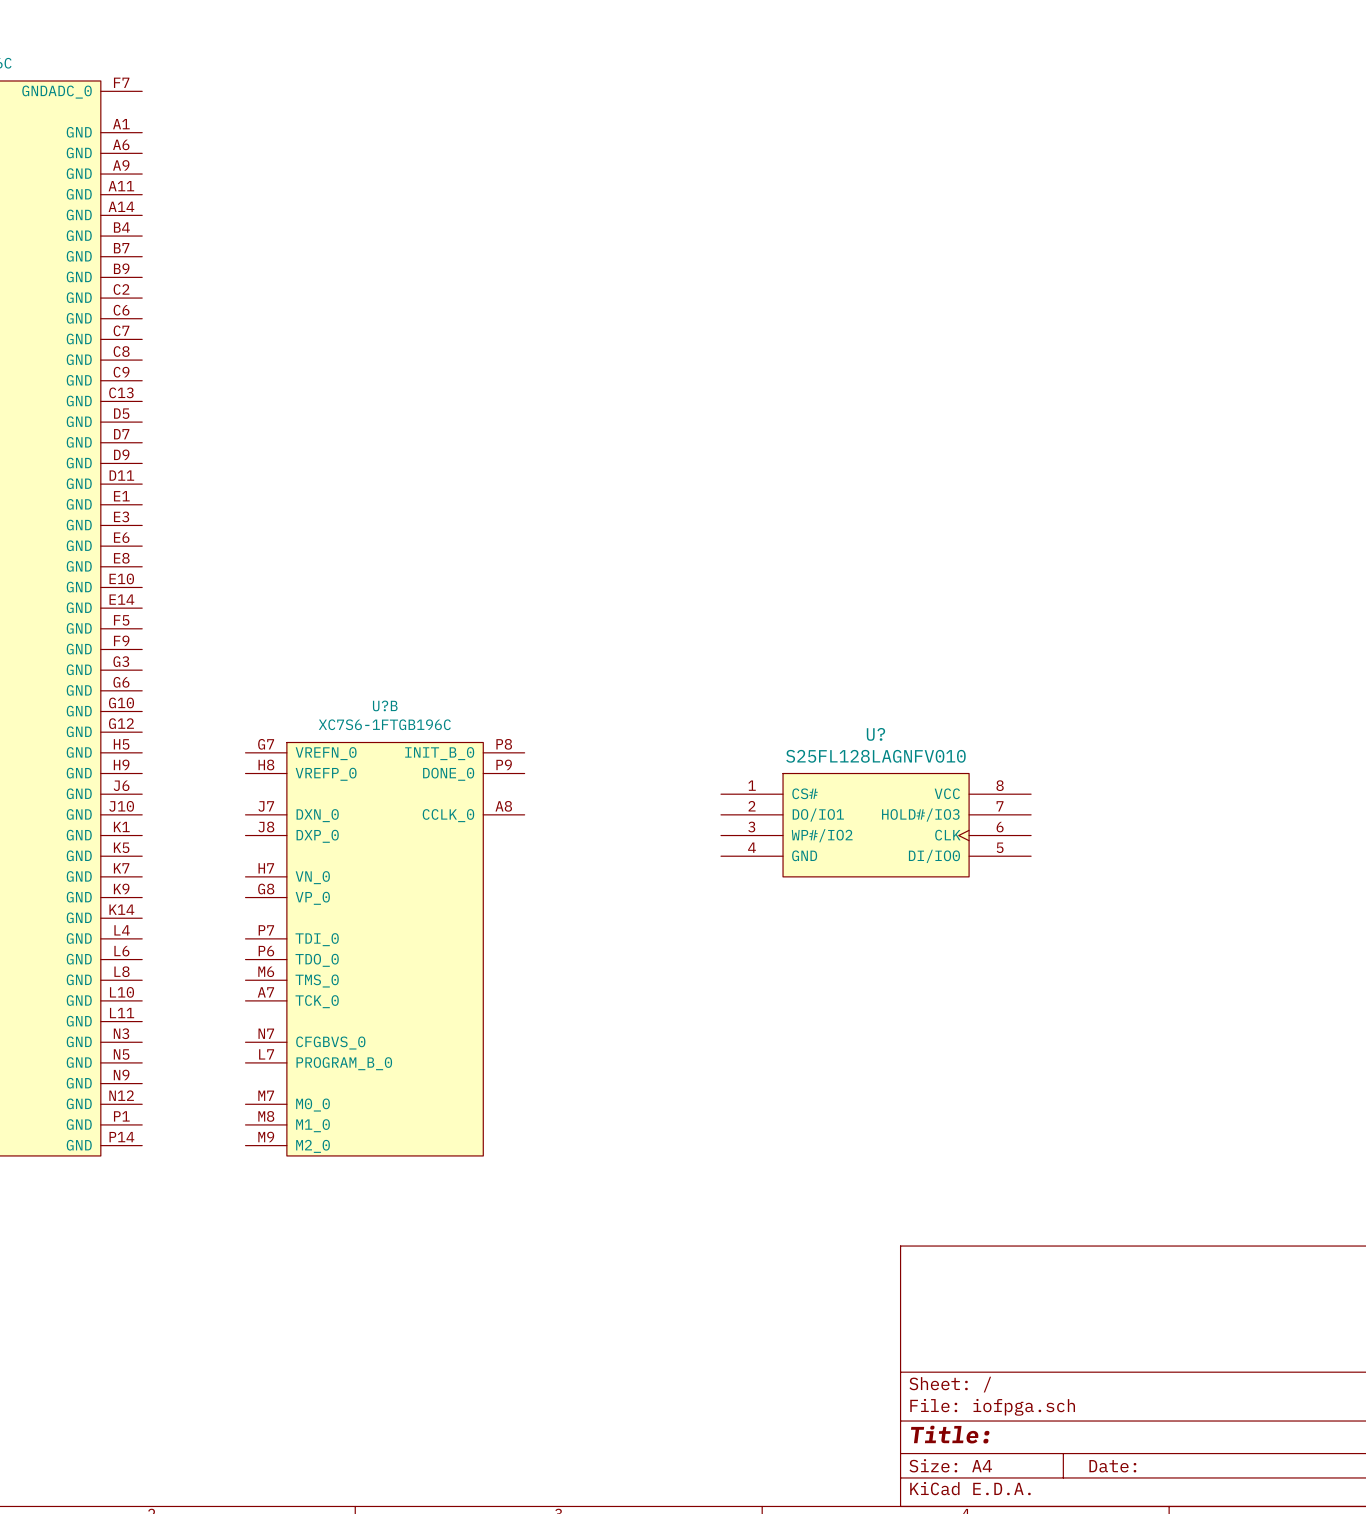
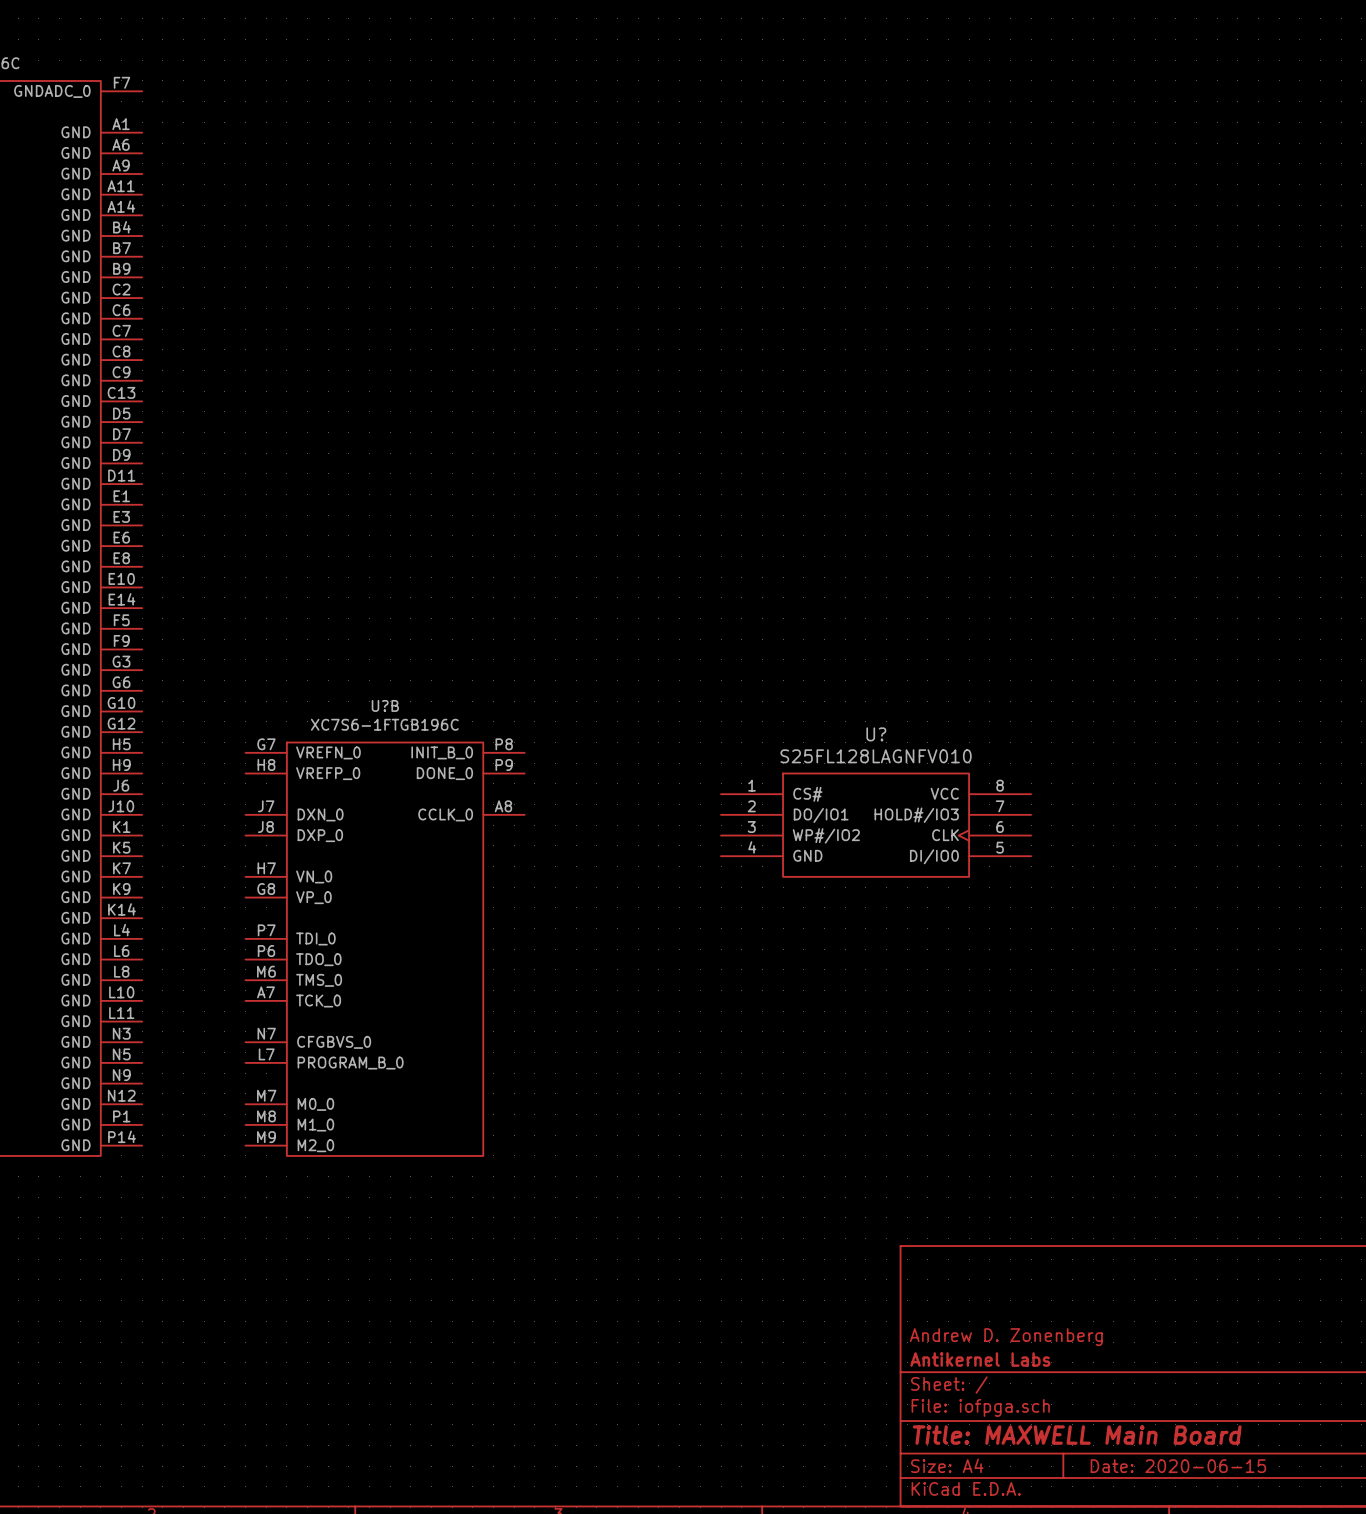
title block: none -> Andrew D. Zonenberg (1006, 1337)
title block: none -> Antikernel Labs (980, 1359)
title block: Title: (950, 1434) -> Title: MAXWELL Main Board (1077, 1435)
title block: Date: (1112, 1466) -> Date: 2020-06-15 (1178, 1466)

